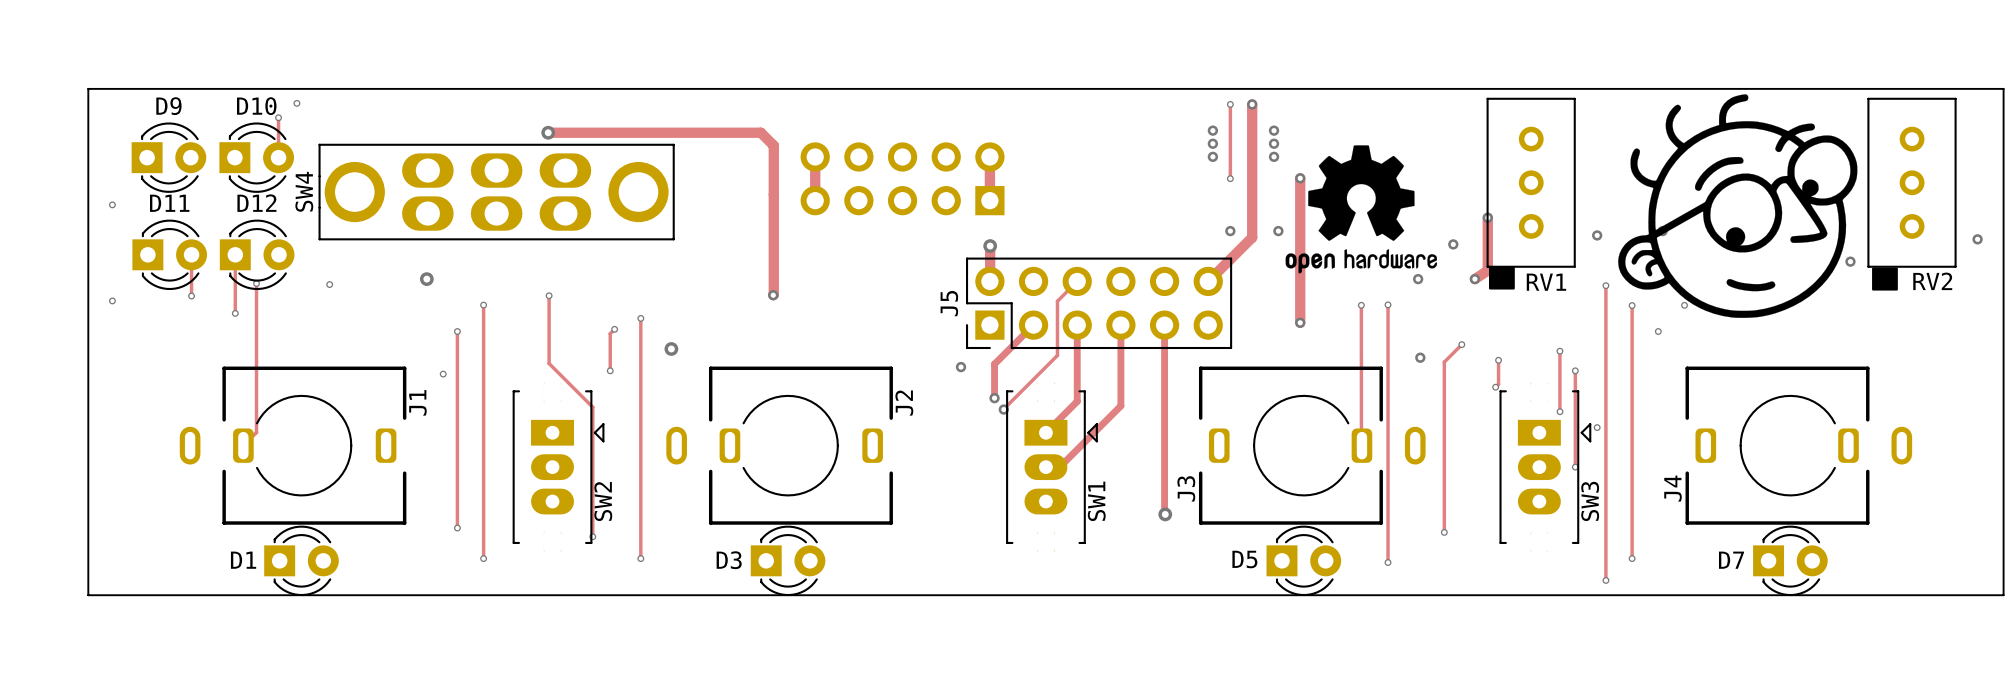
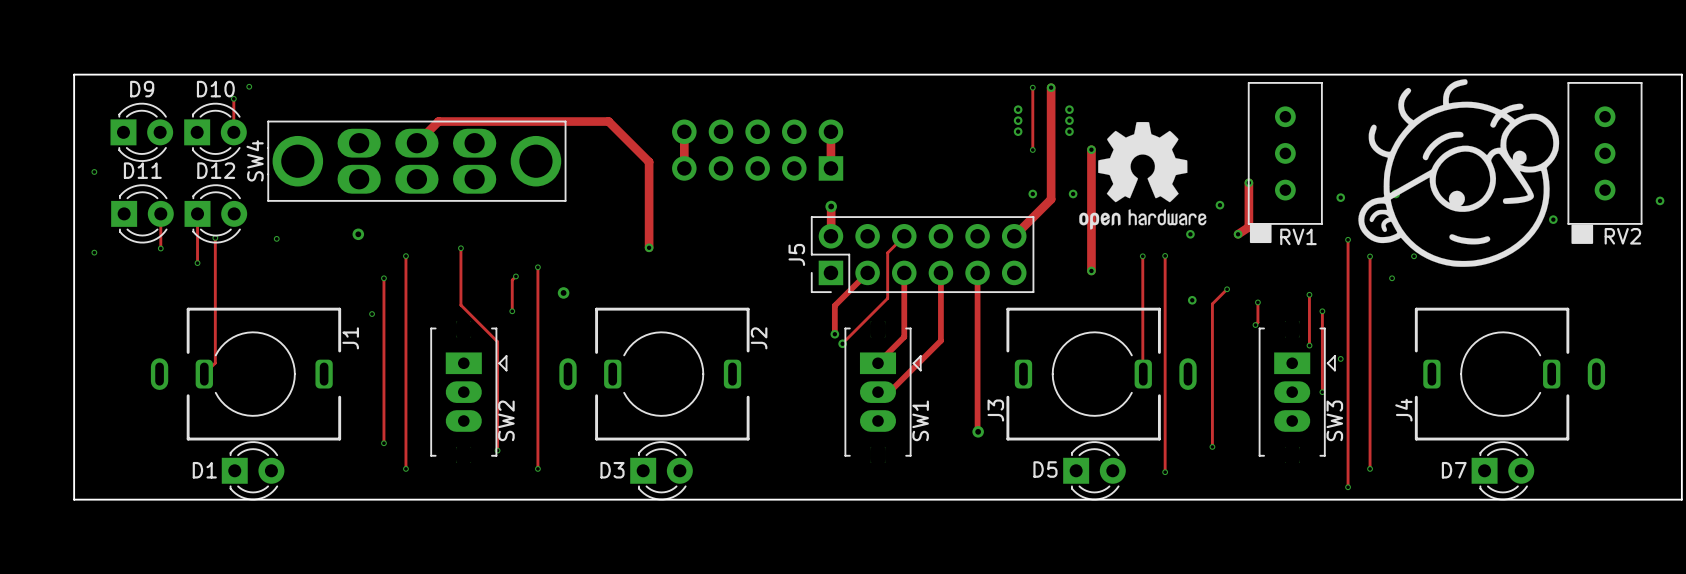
track: (548, 132) (760, 132) (773, 145) (773, 295) -> (416, 143) (438, 121) (608, 121) (649, 162) (649, 247)
via: (548, 132) -> none
via: (961, 367) -> none

